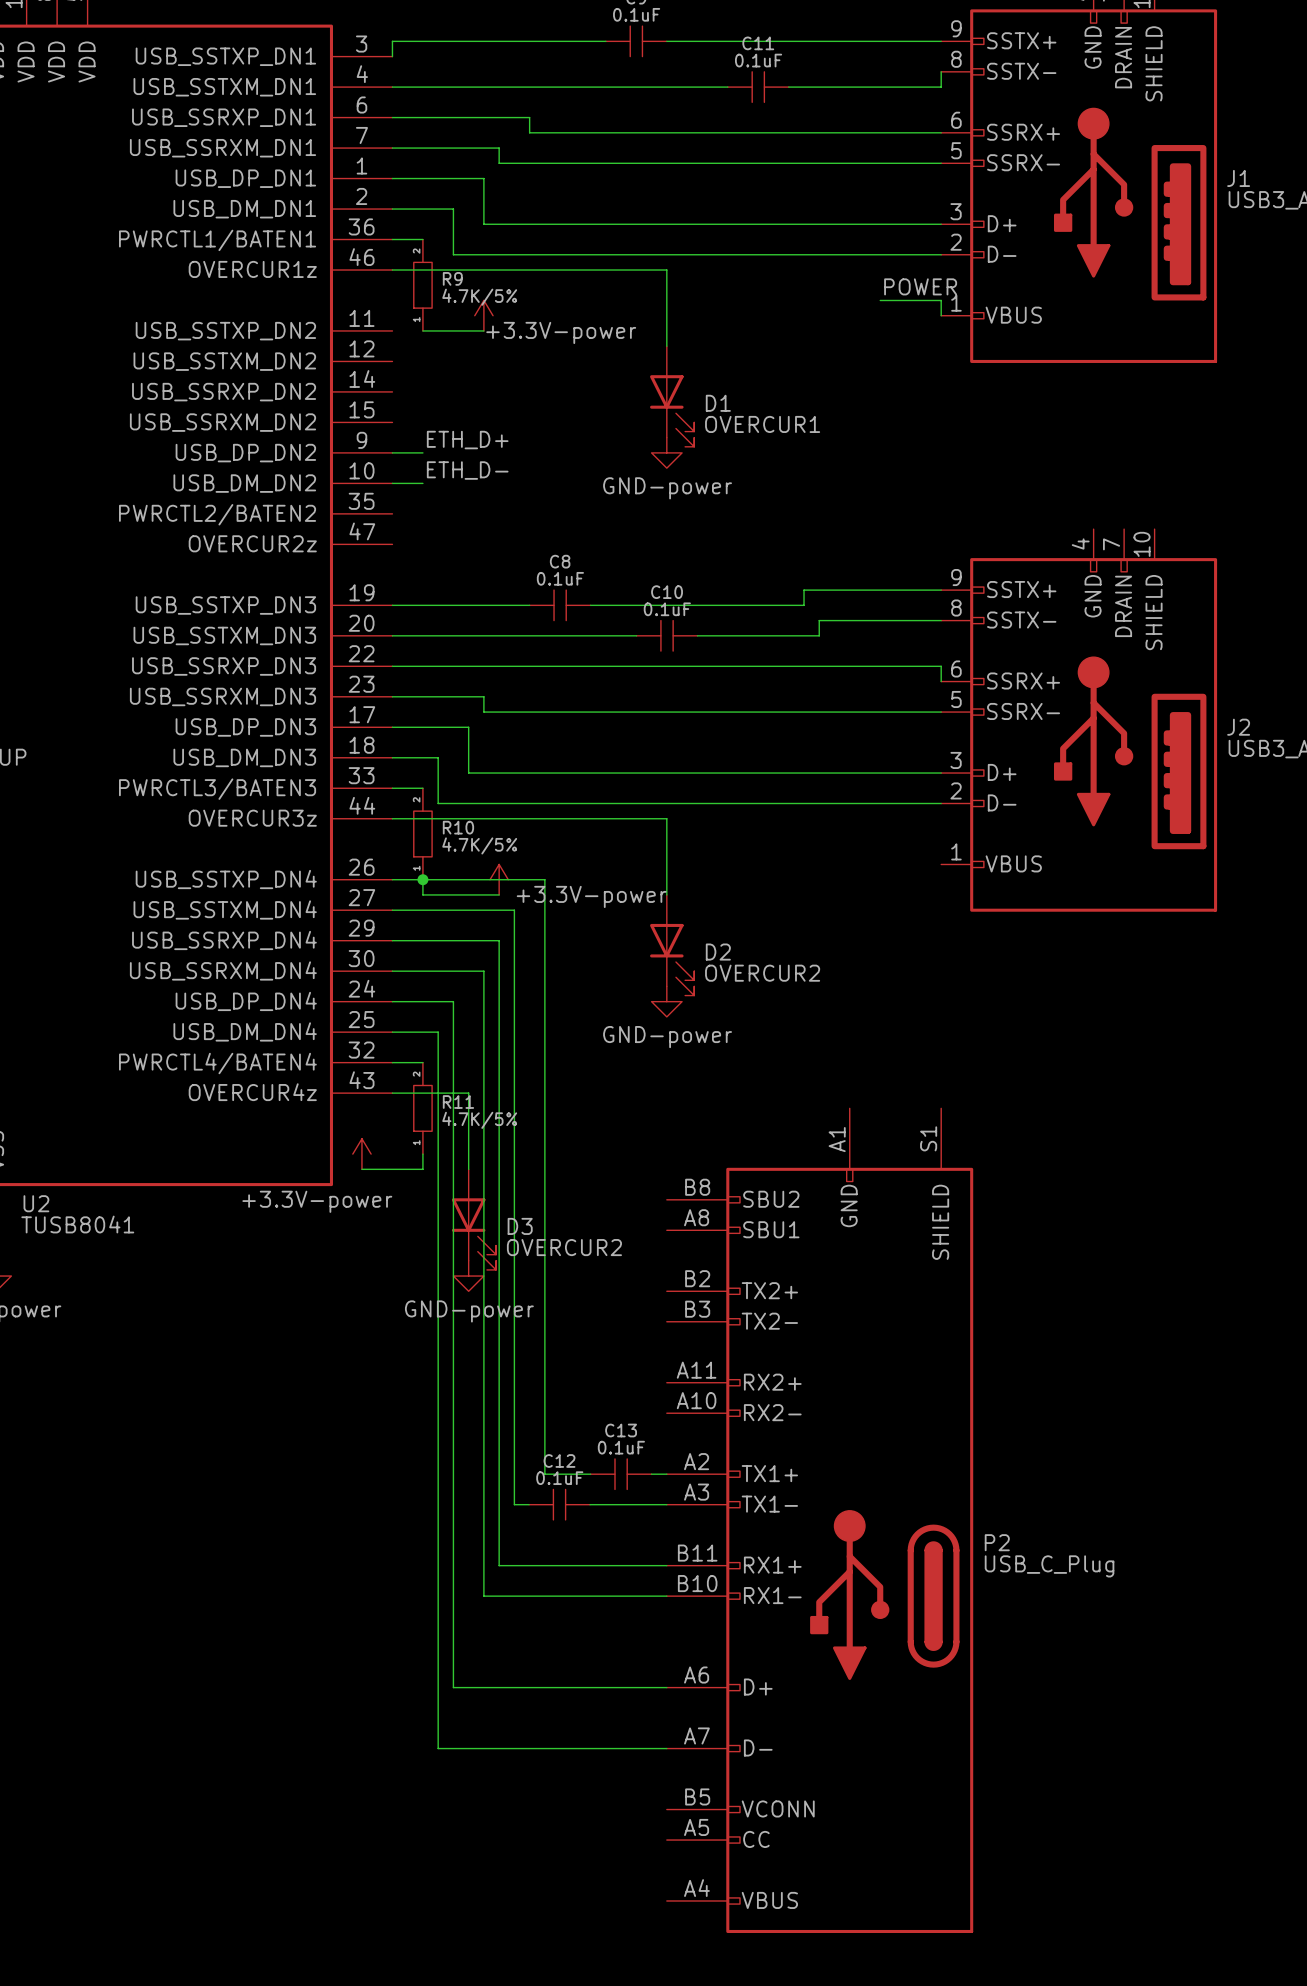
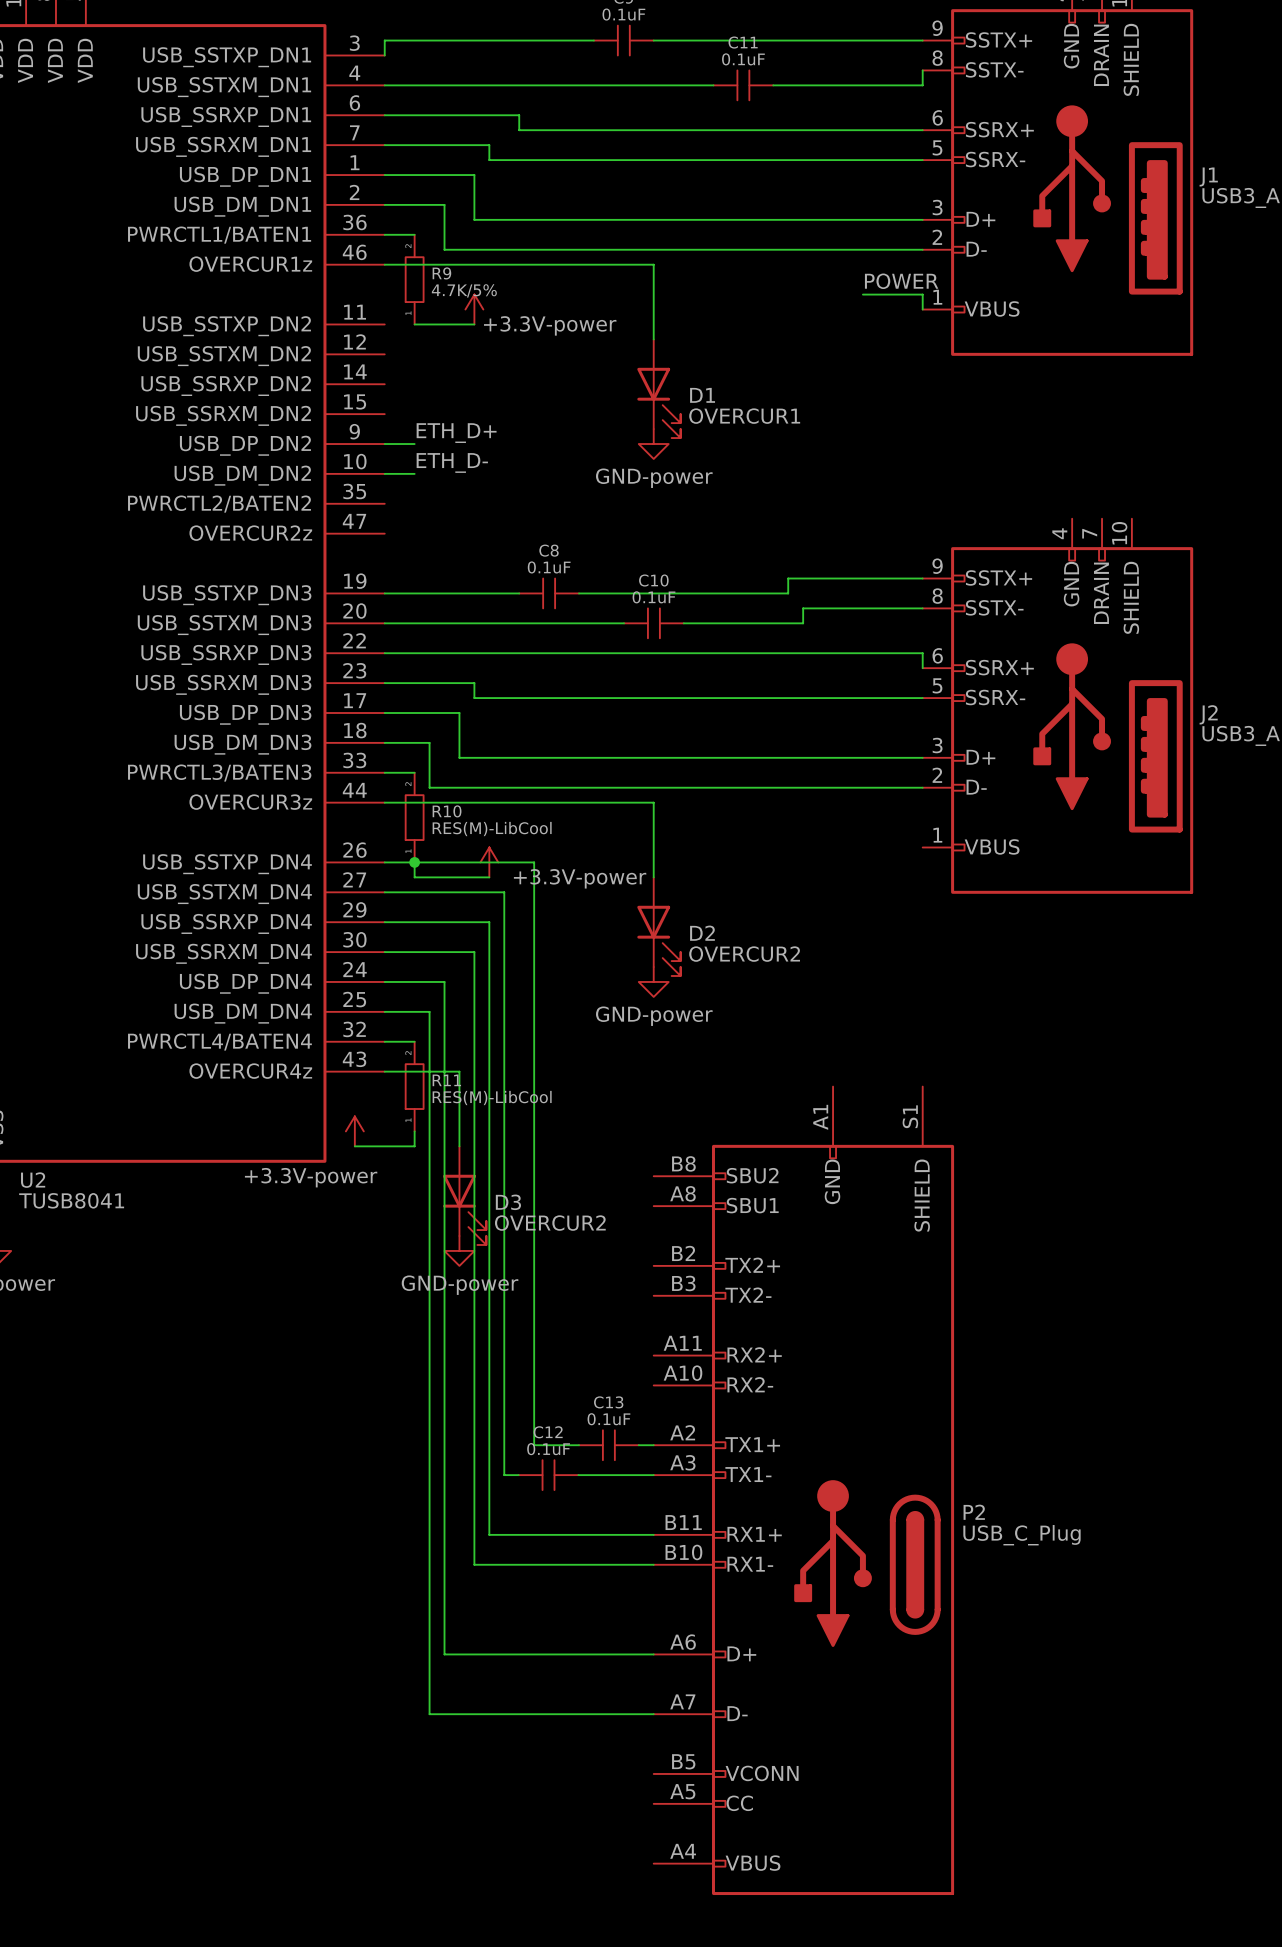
R10 value: 4.7K/5% (479, 845) -> RES(M)-LibCool (492, 829)
R11 value: 4.7K/5% (479, 1120) -> RES(M)-LibCool (492, 1098)

